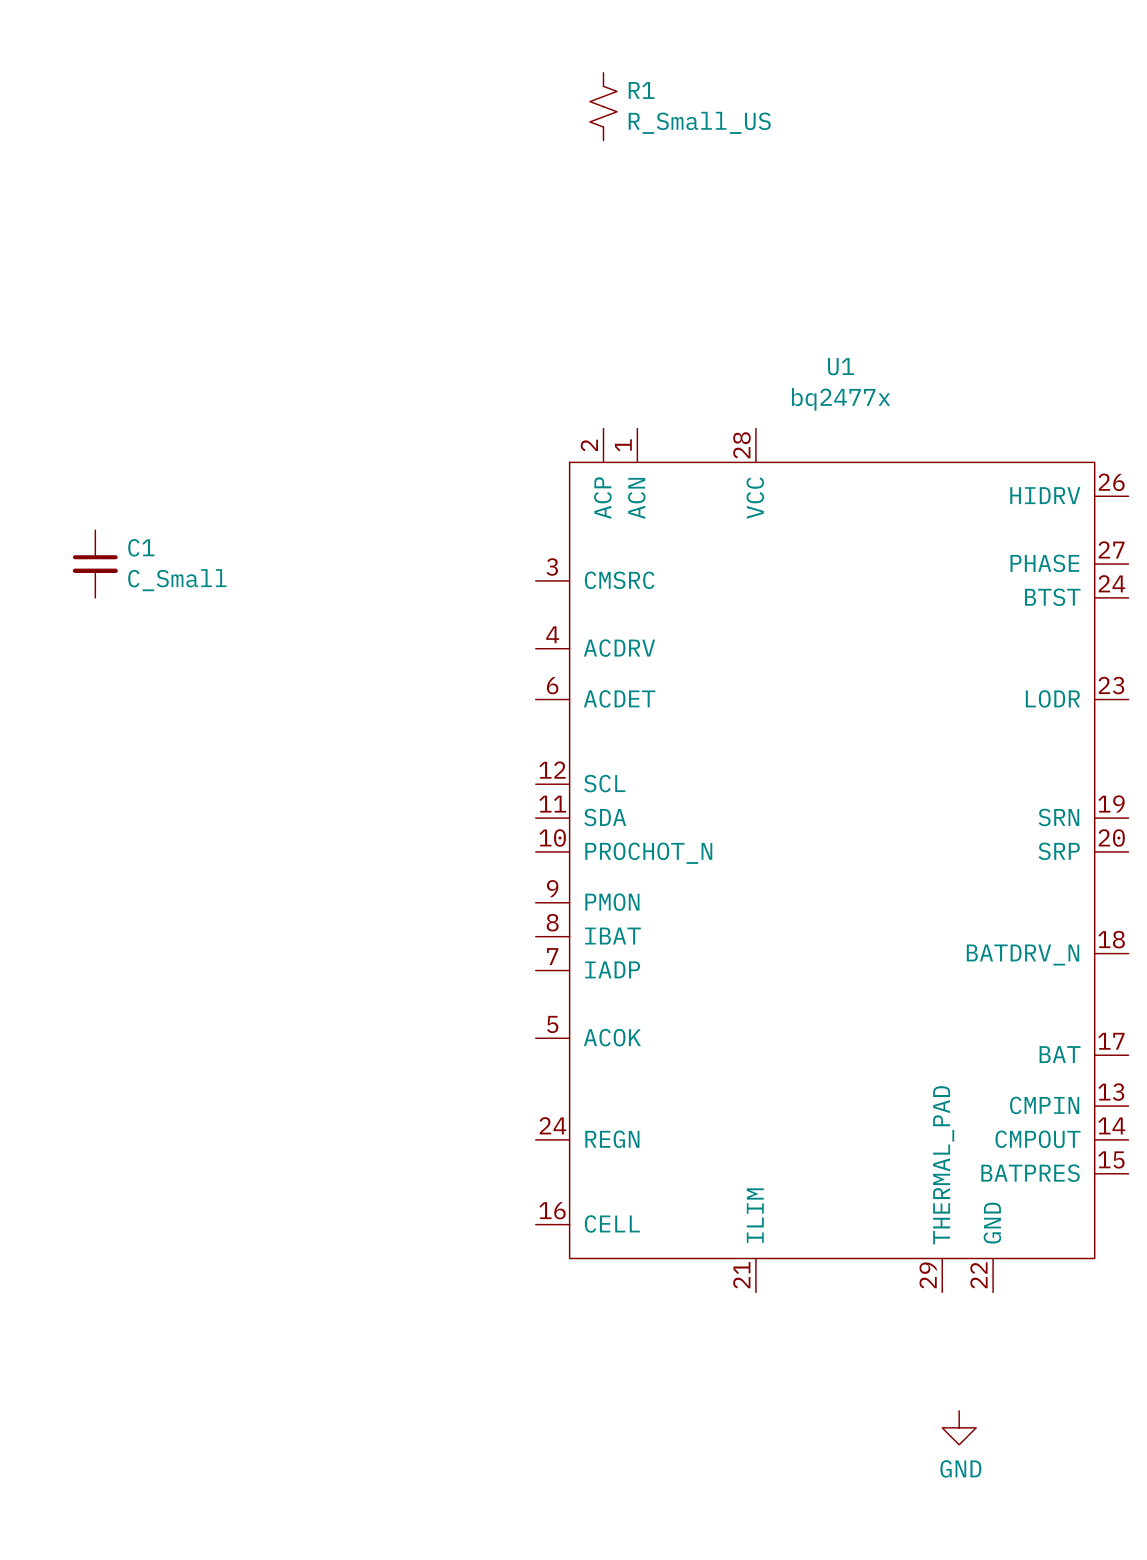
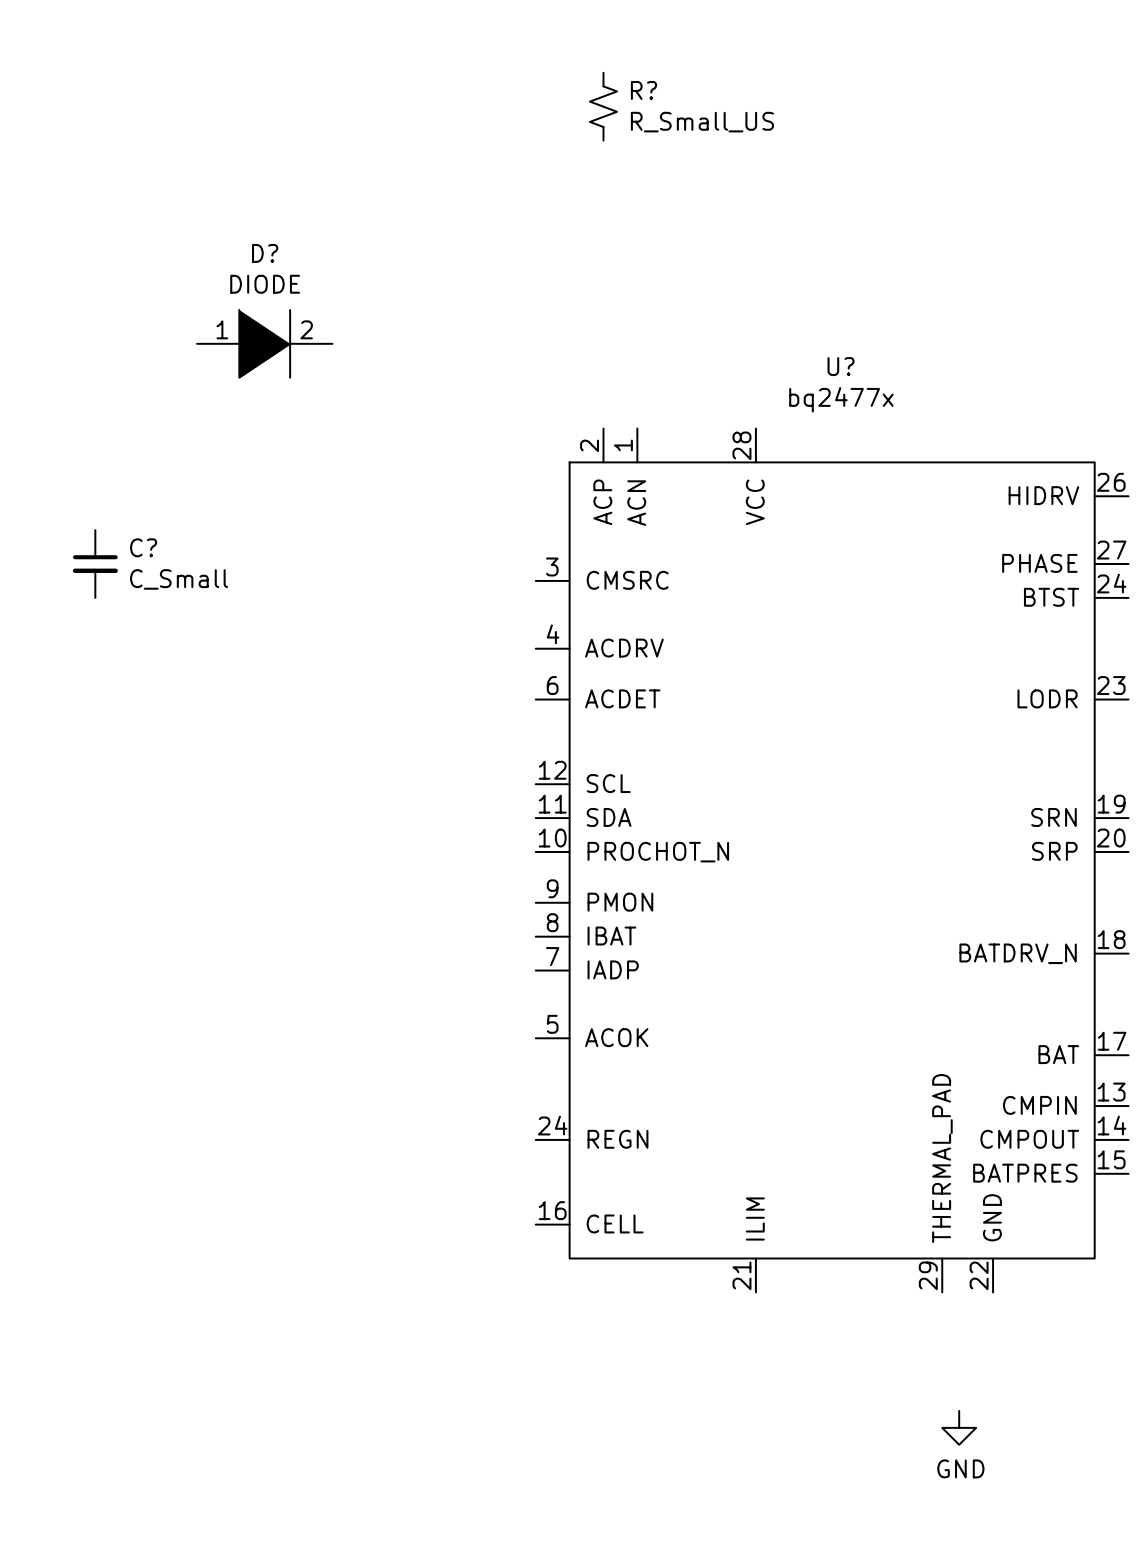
R1 name: R1 (641, 90) -> R? (643, 90)
D?: none -> DIODE (264, 343)
U1 name: U1 (841, 366) -> U? (841, 366)
C1 name: C1 (141, 547) -> C? (143, 547)

